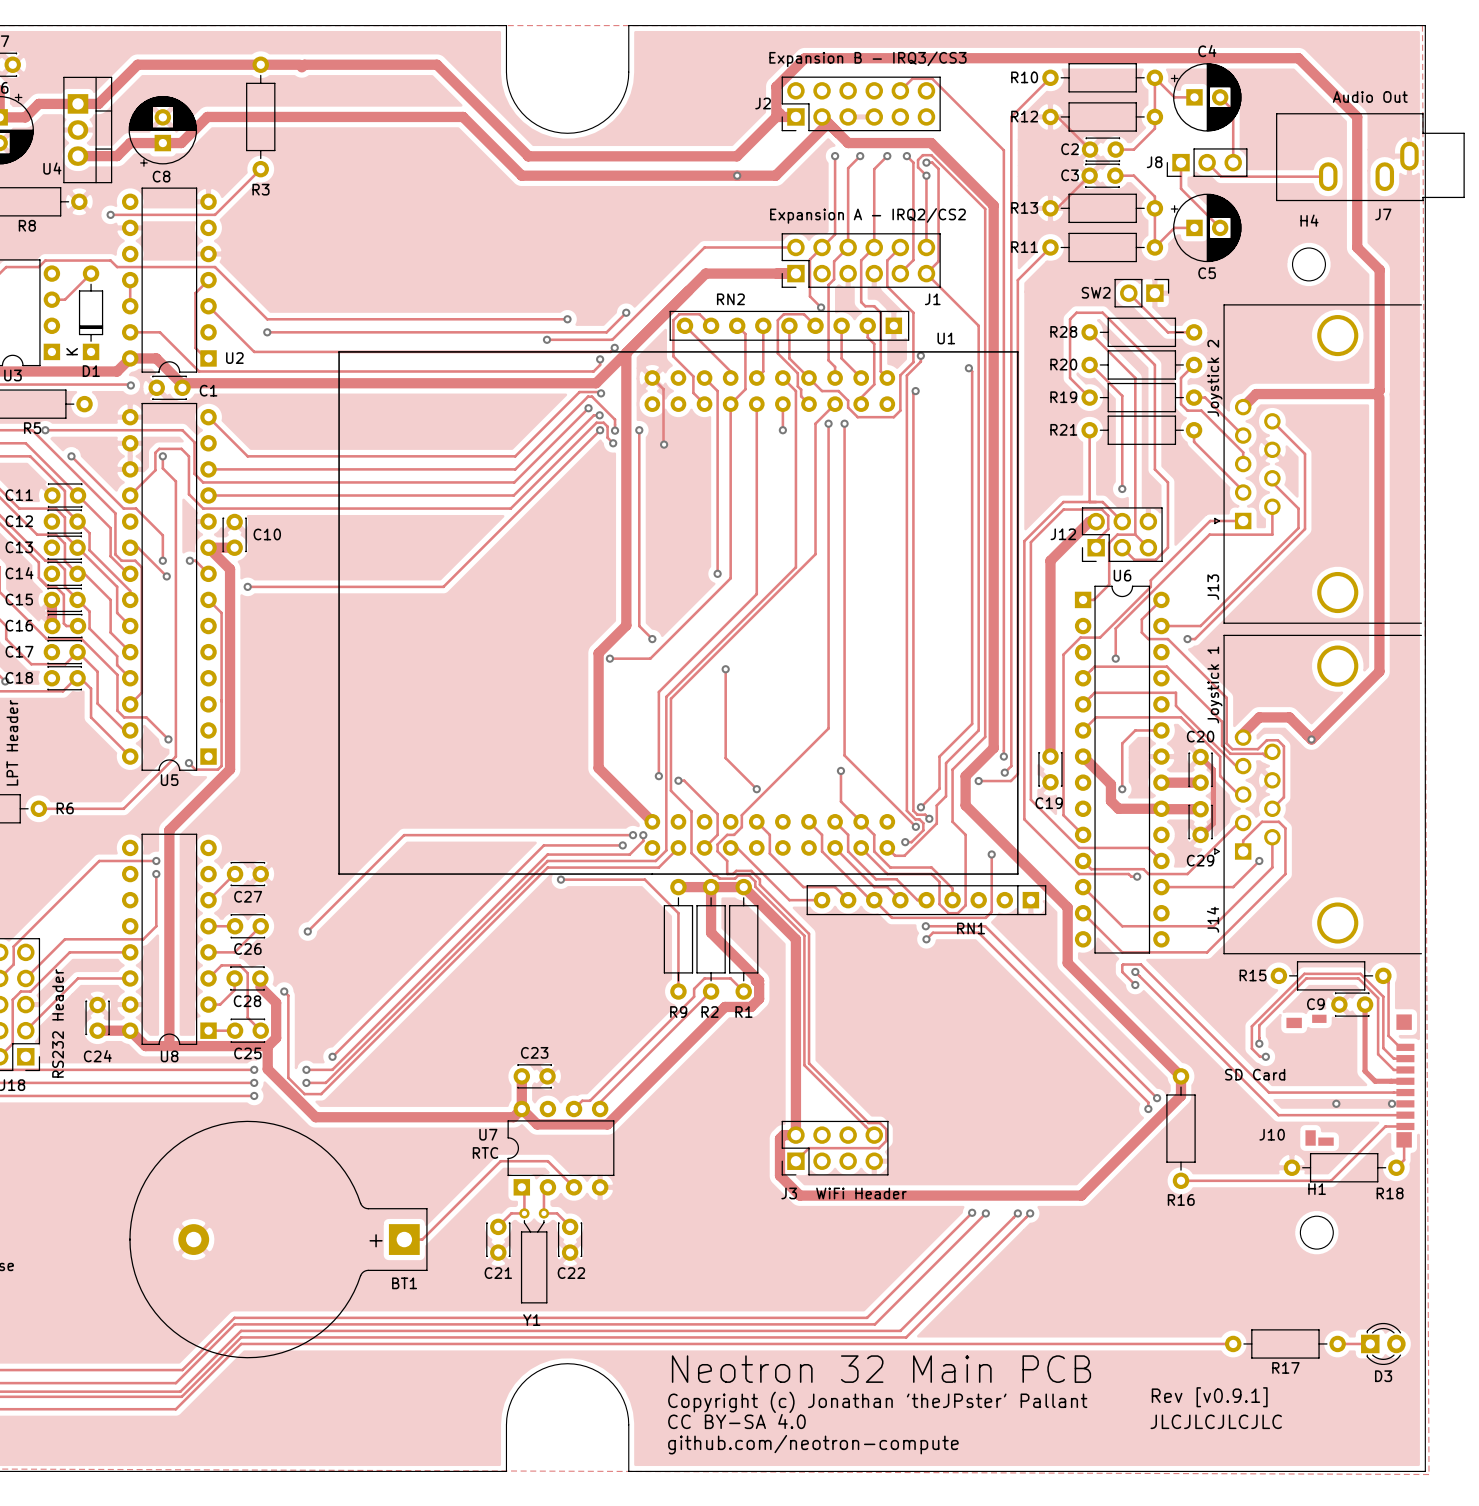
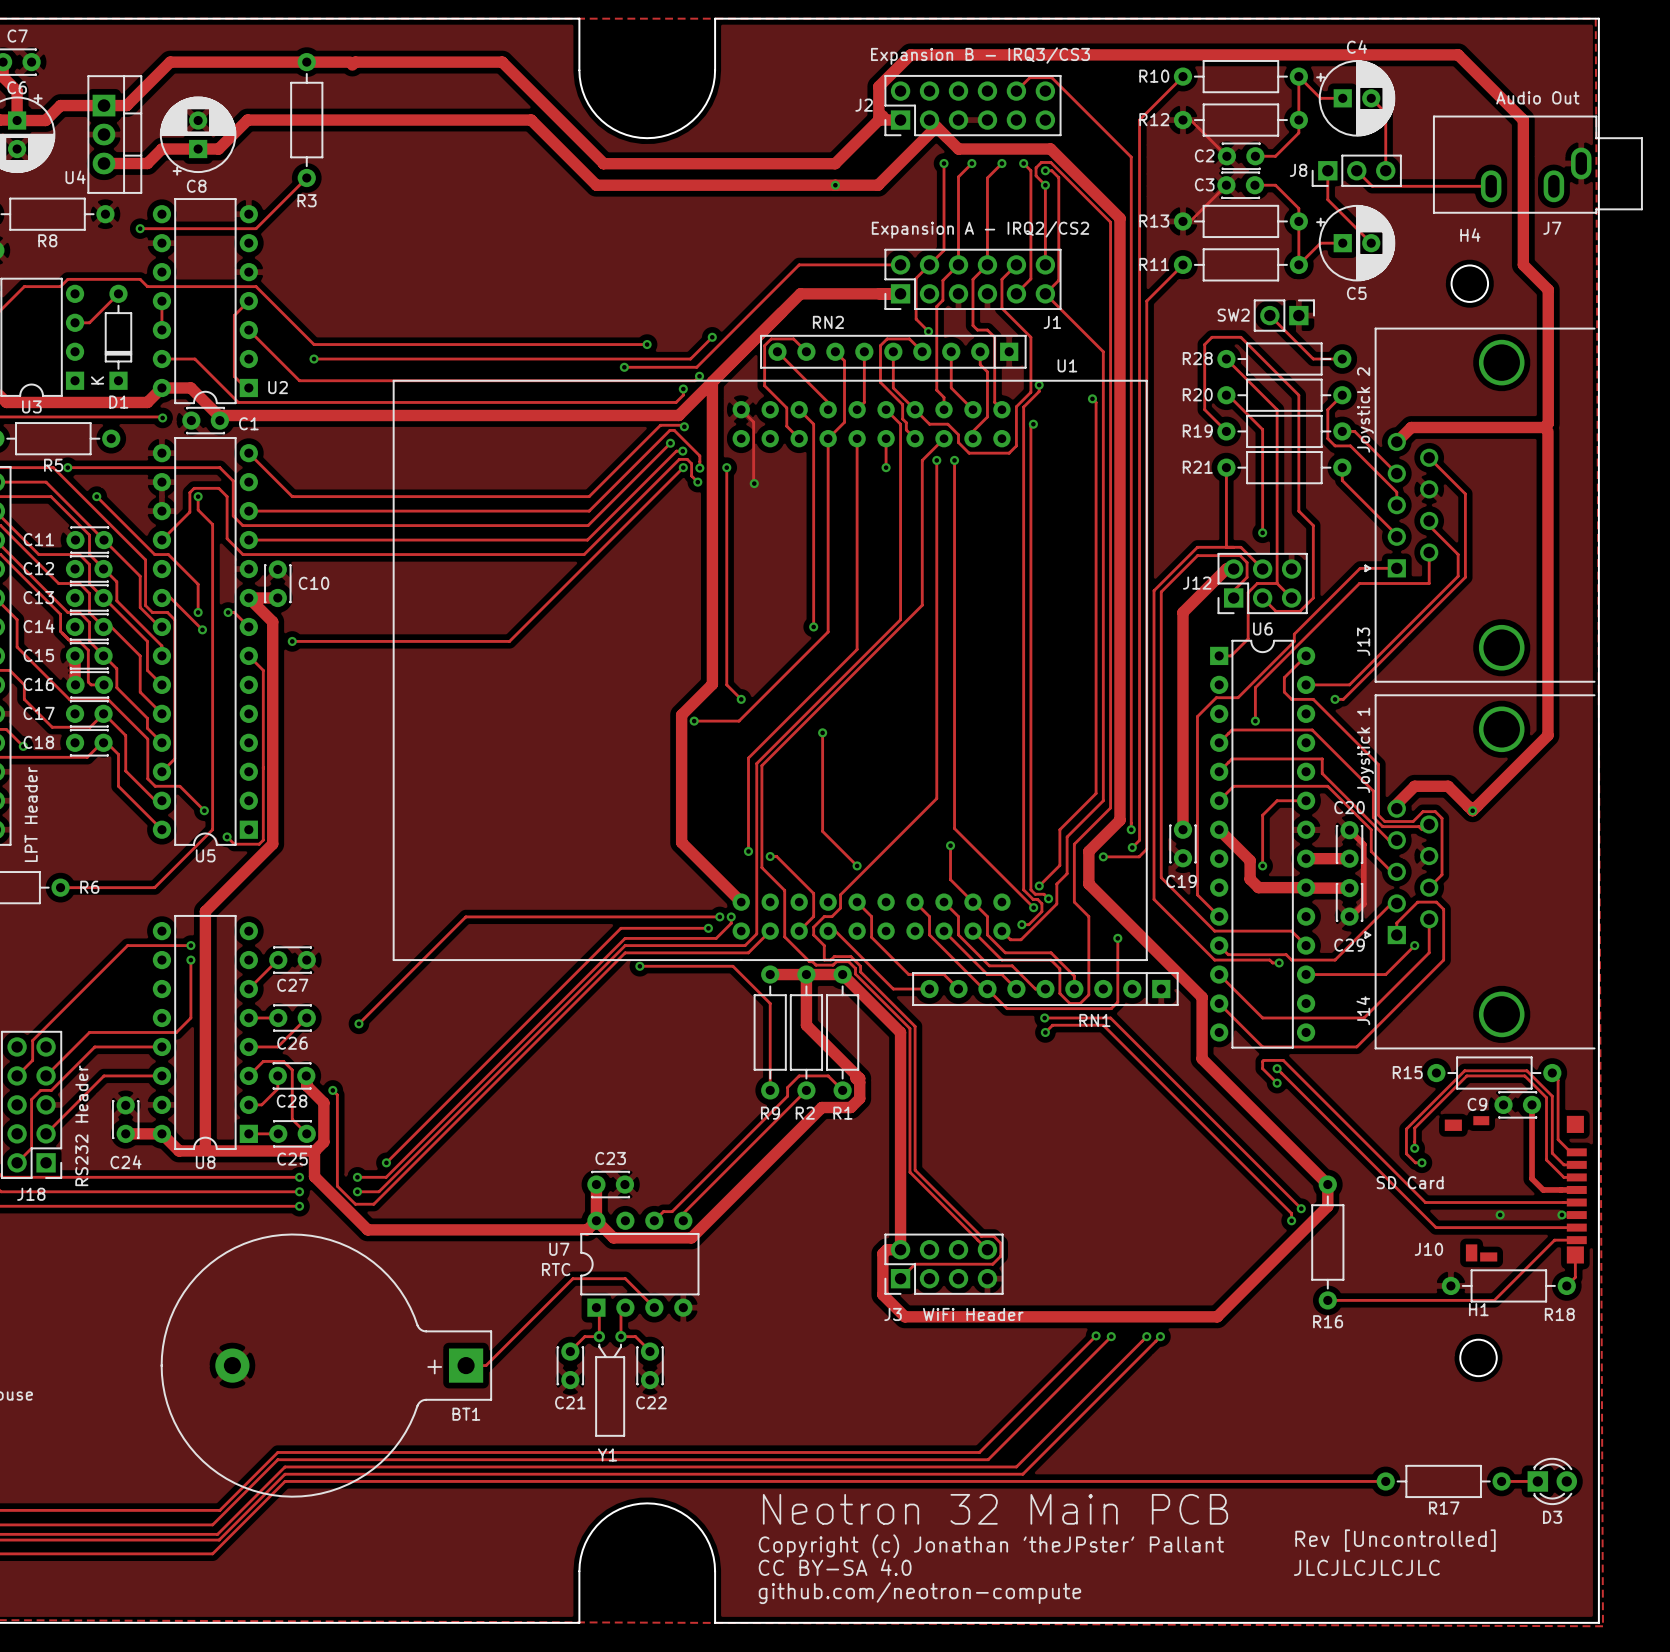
text: Rev [v0.9.1] (1209, 1397) -> Rev [Uncontrolled] (1395, 1540)

